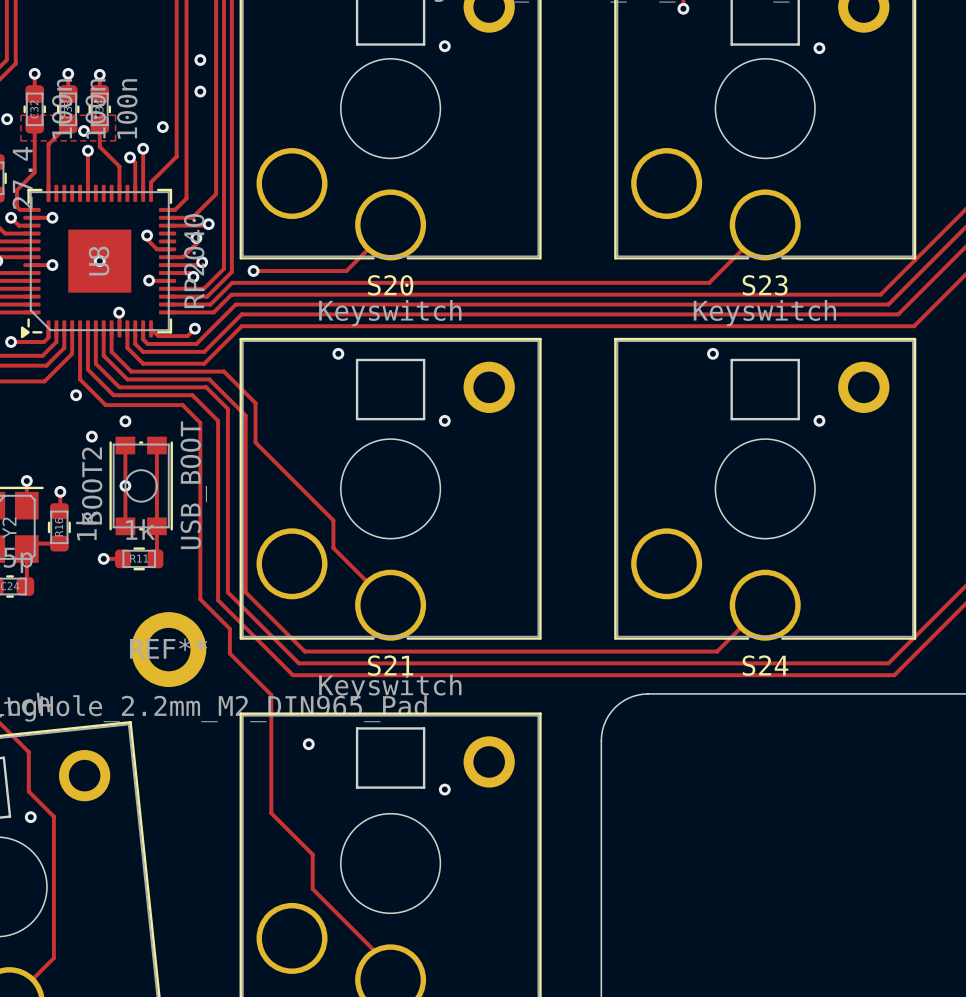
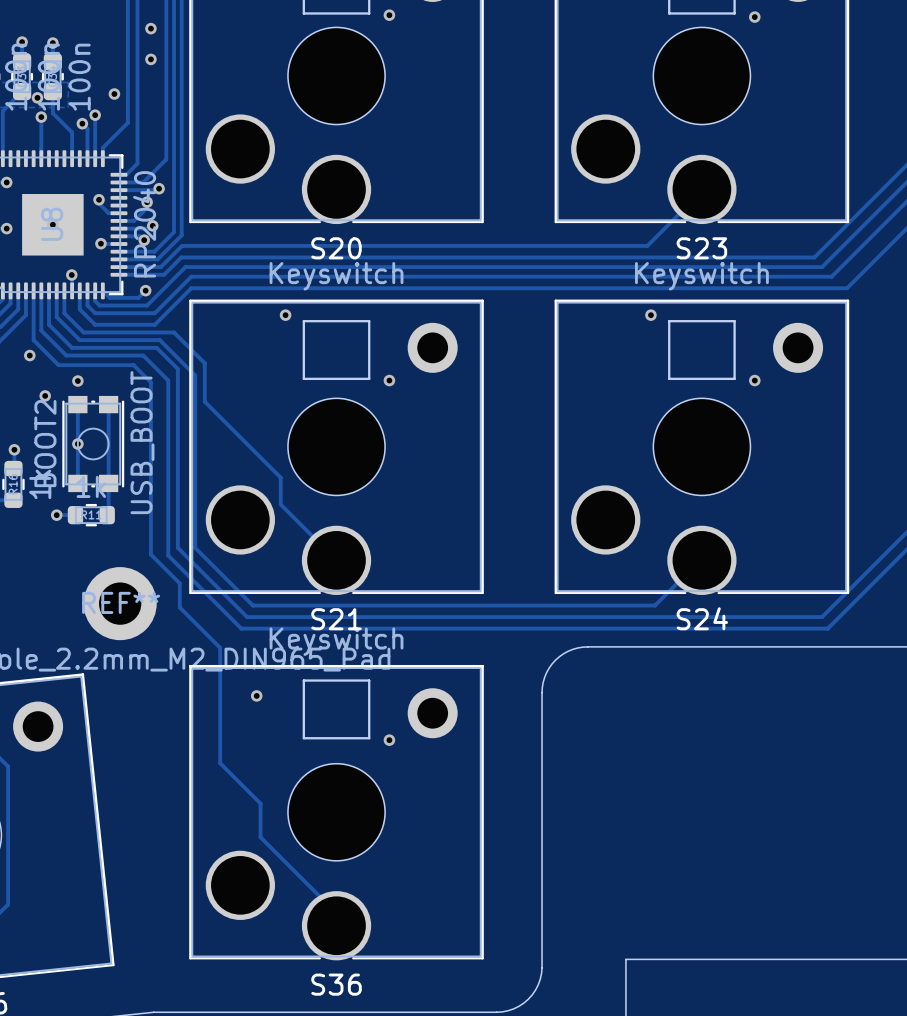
track: (390, 226) (346, 271) (253, 271) -> none
via: (253, 271) -> none

